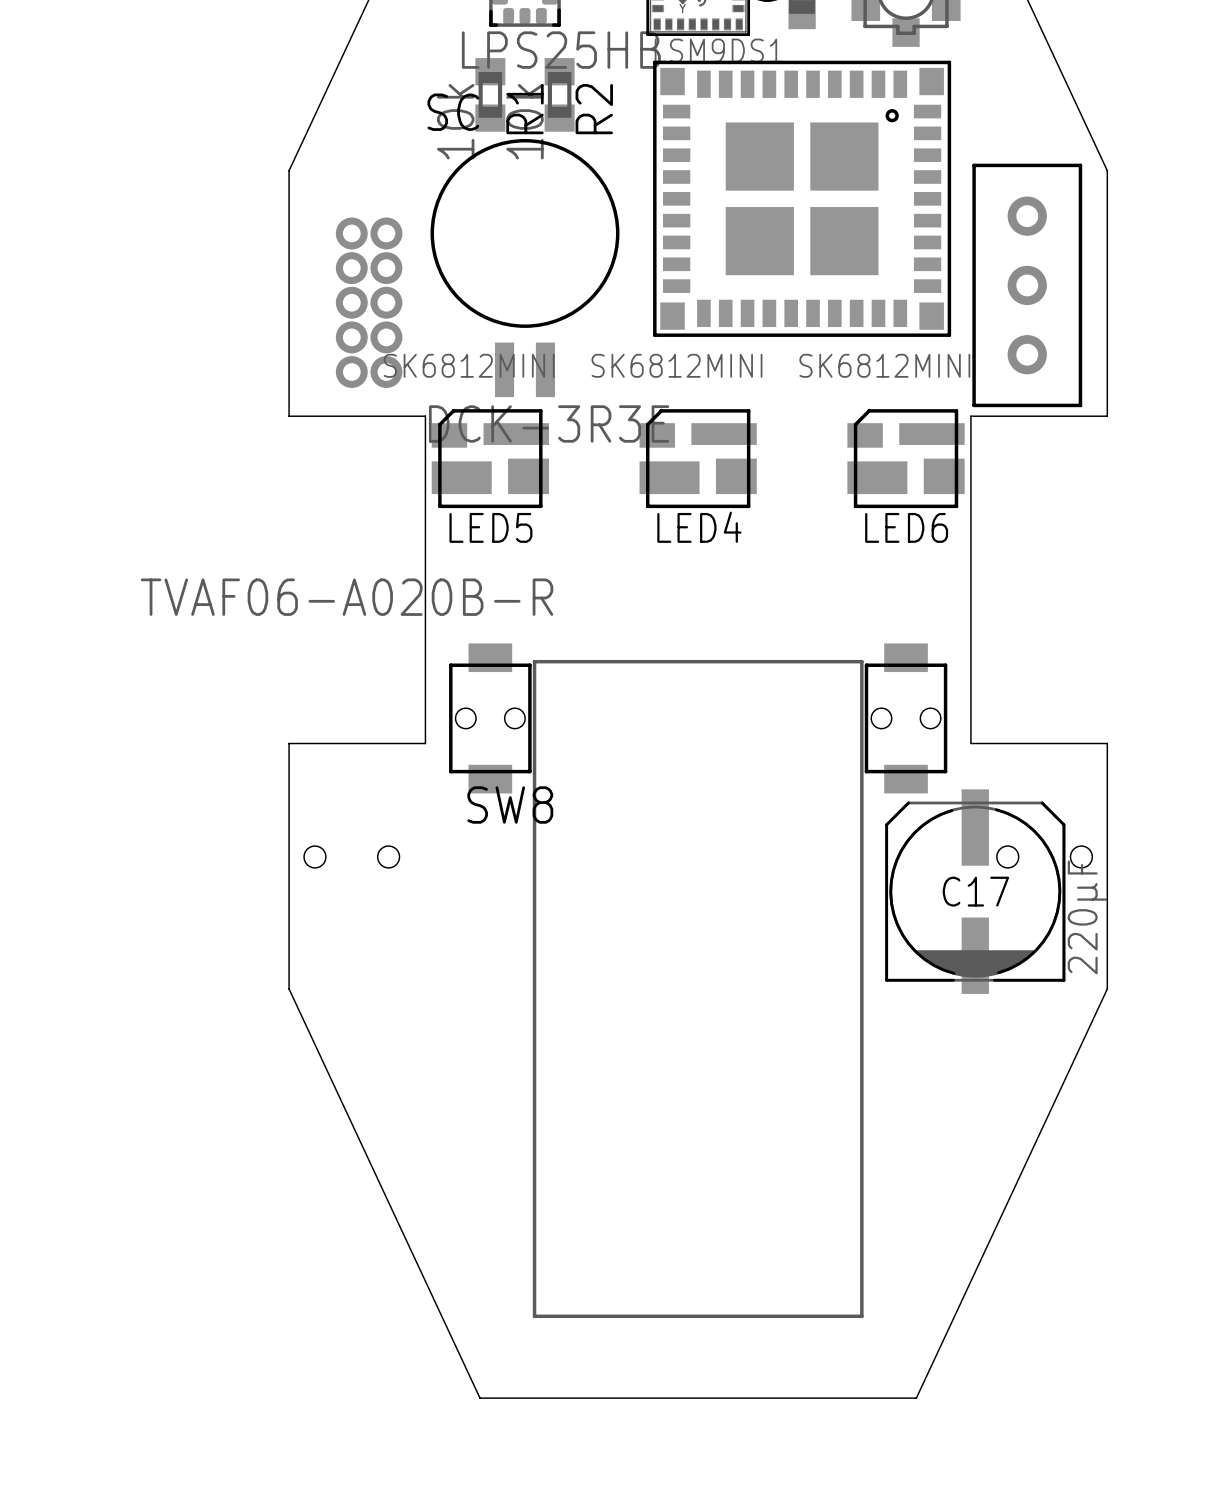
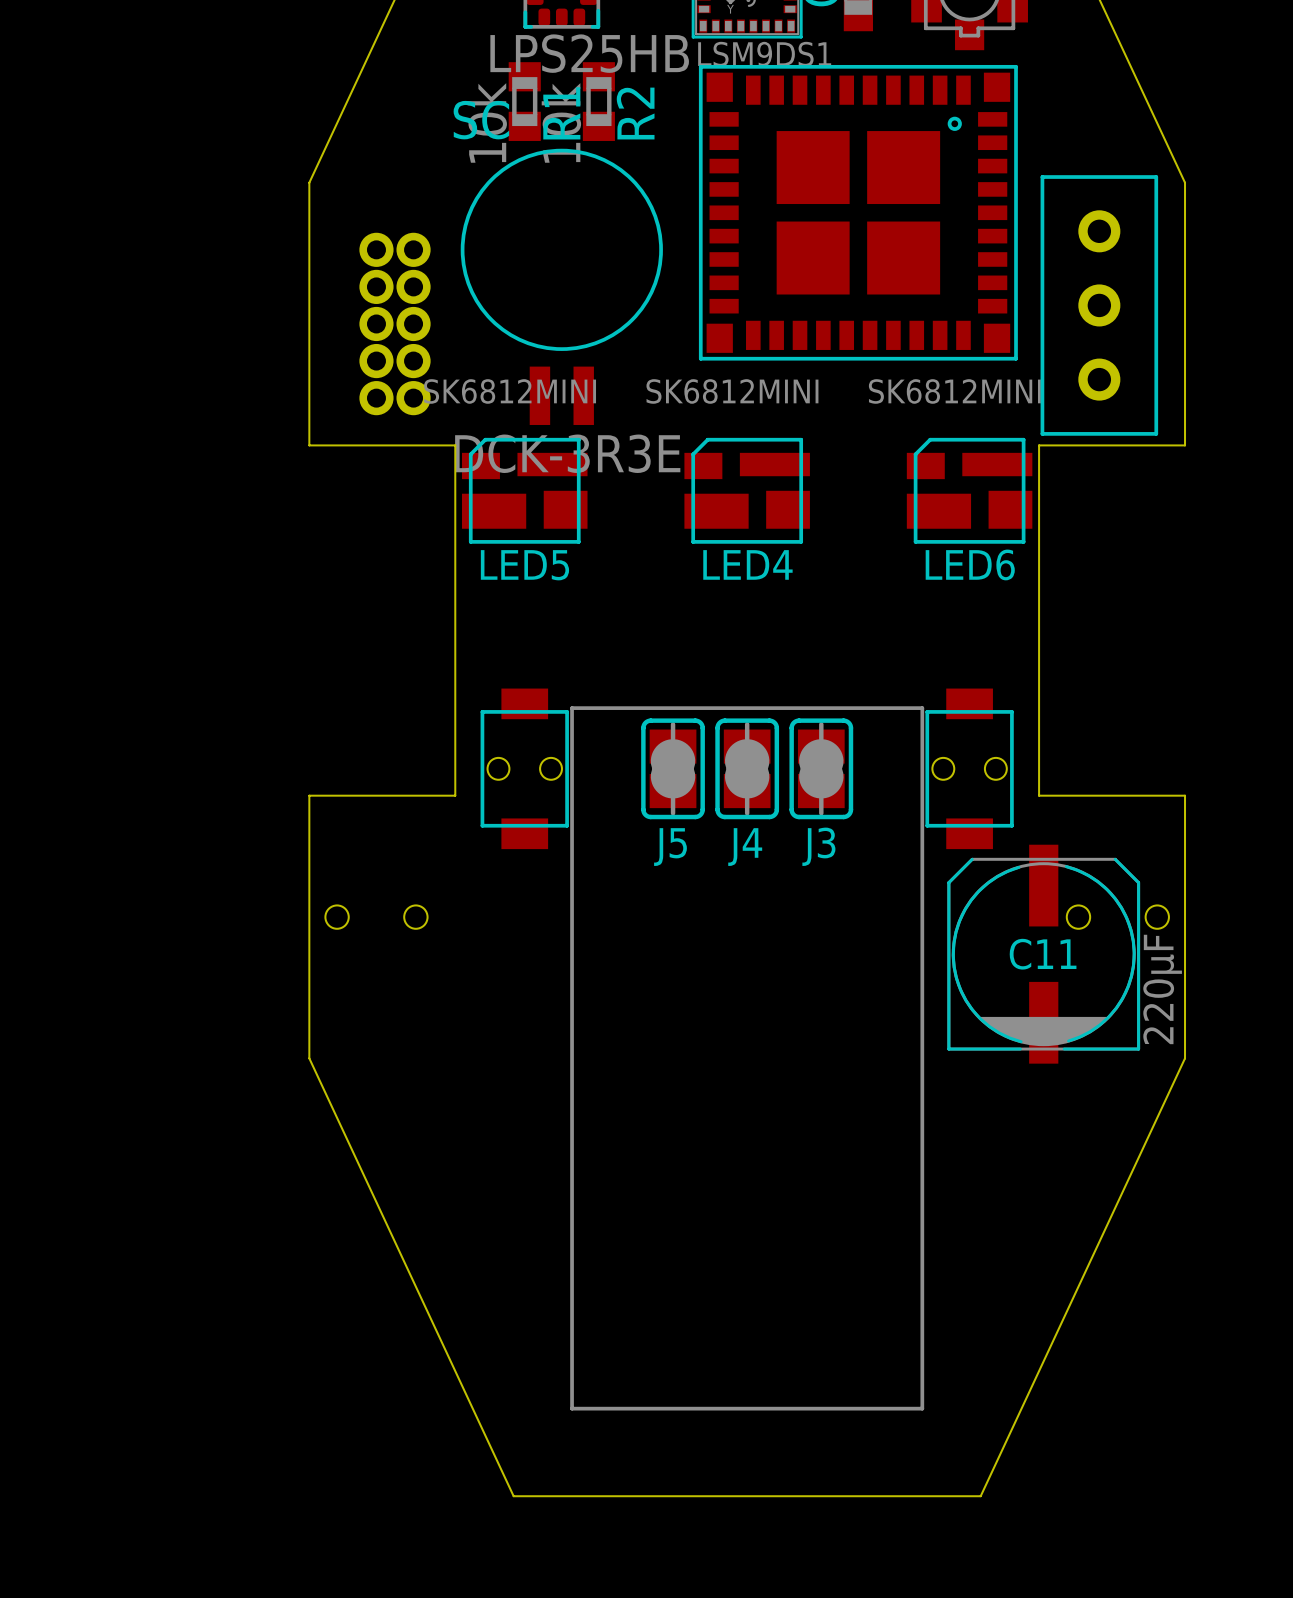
SW8 value: TVAF06-A020B-R (347, 597) -> none
J5: none -> (673, 768)
J4: none -> (747, 768)
J3: none -> (821, 768)
SW8 name: SW8 (510, 805) -> none
C17 name: C17 (975, 891) -> C11 (1043, 954)

